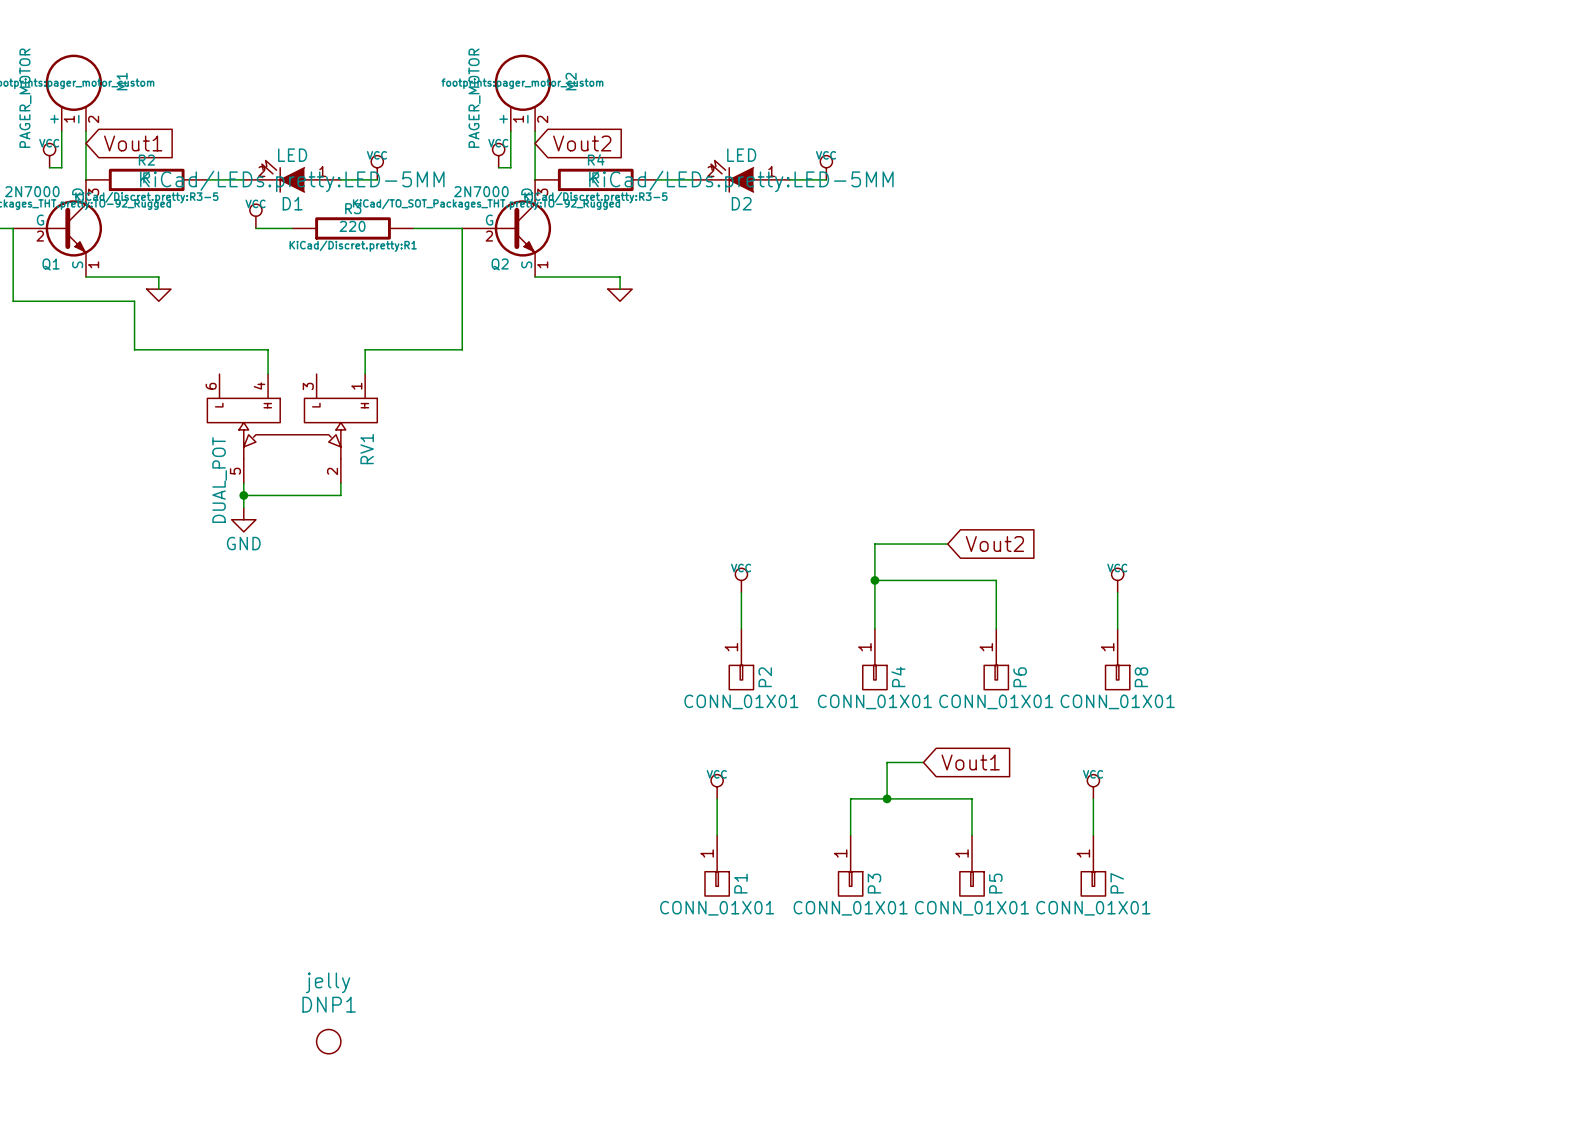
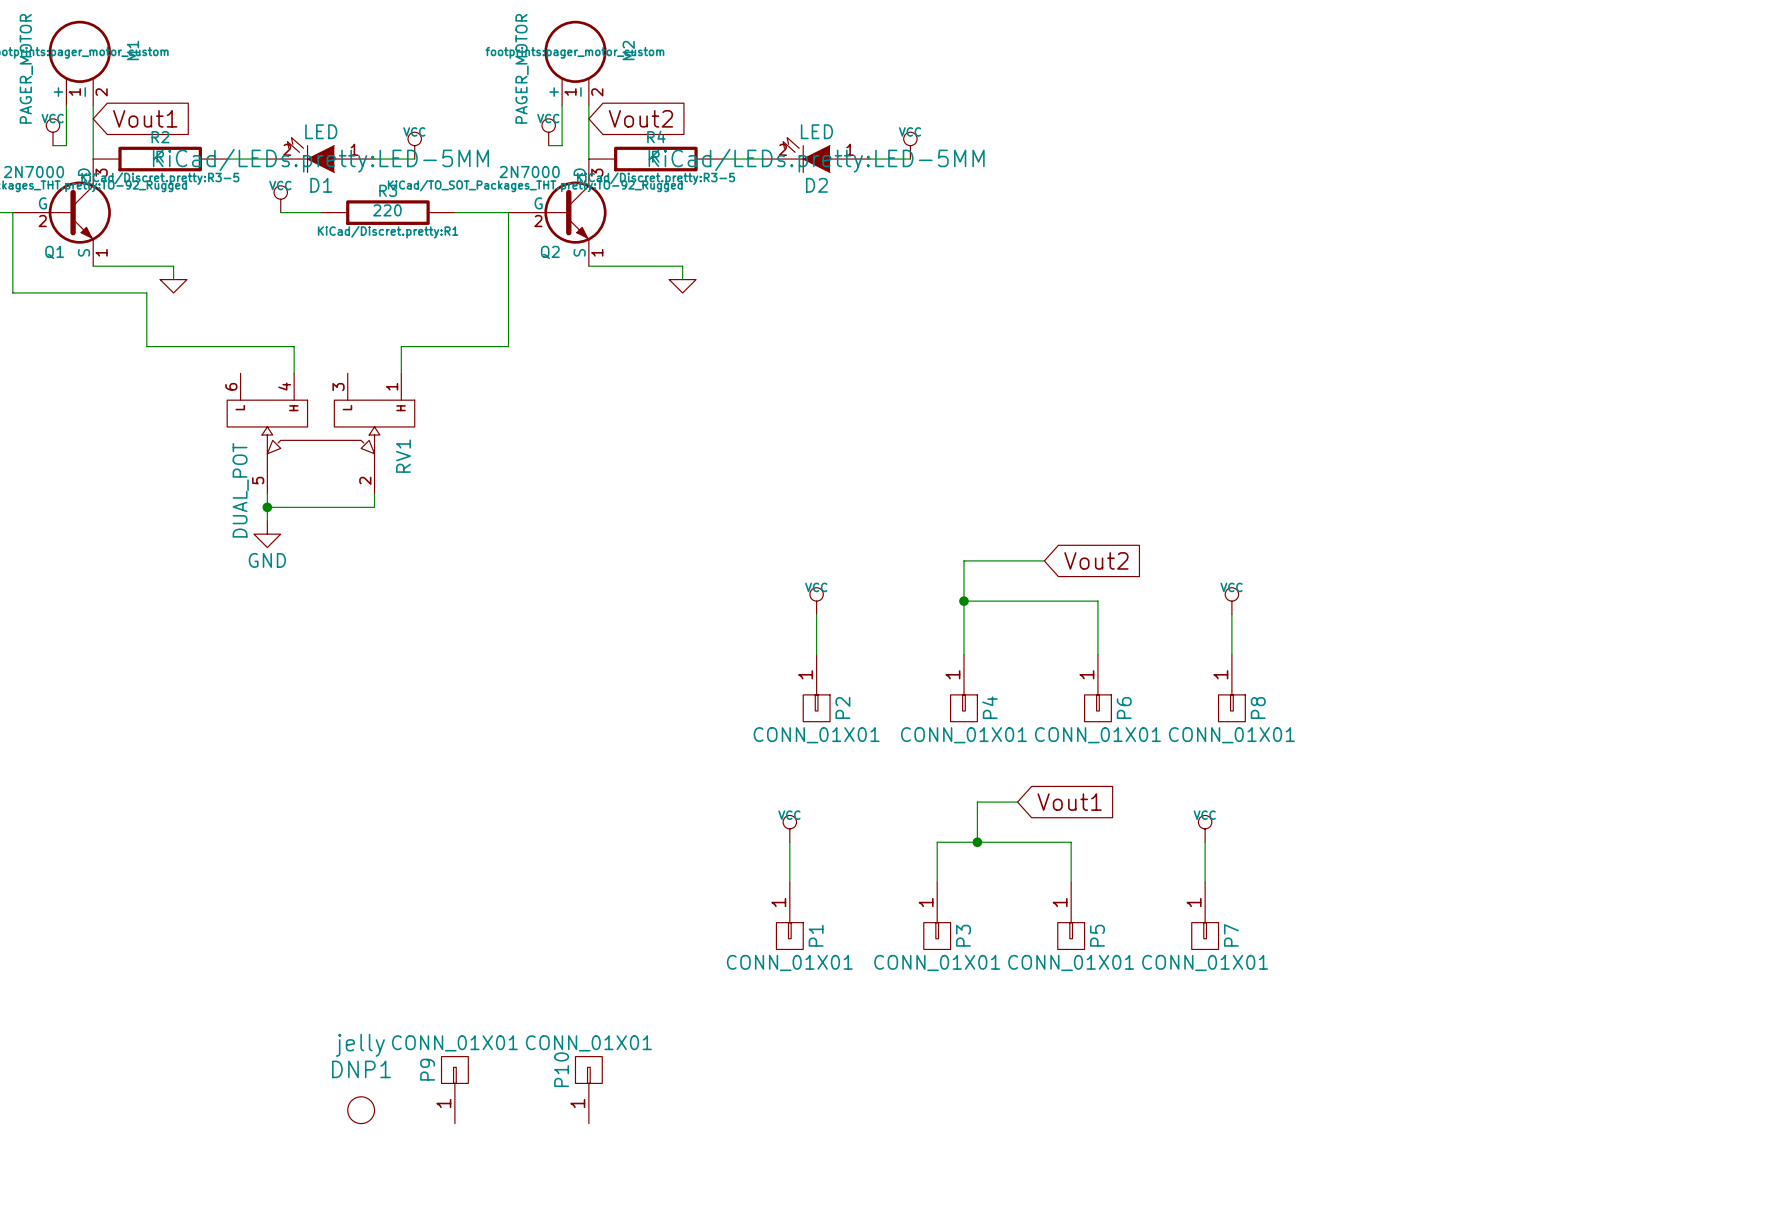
P9: none -> CONN_01X01 (454, 1090)
P10: none -> CONN_01X01 (588, 1090)

